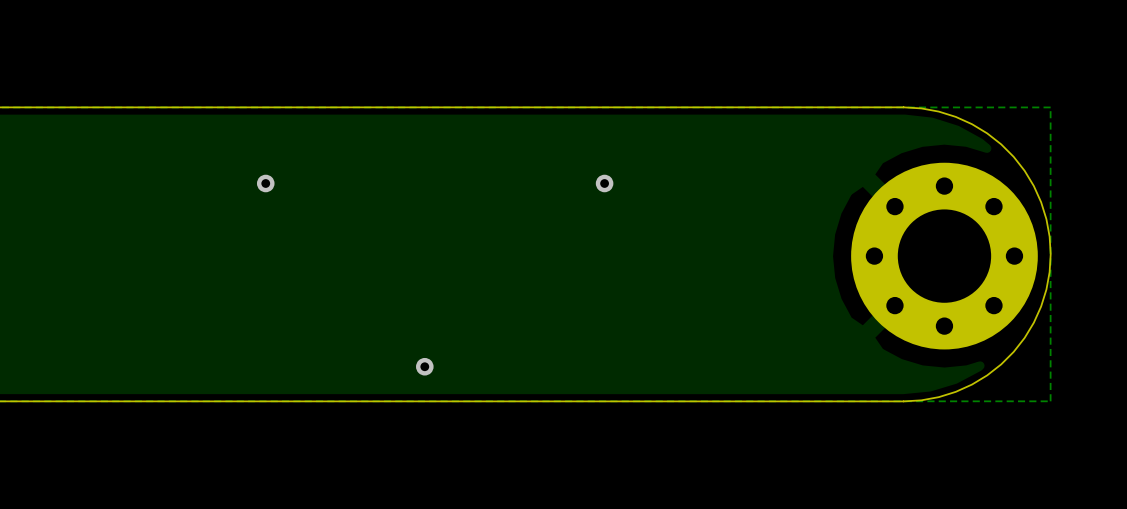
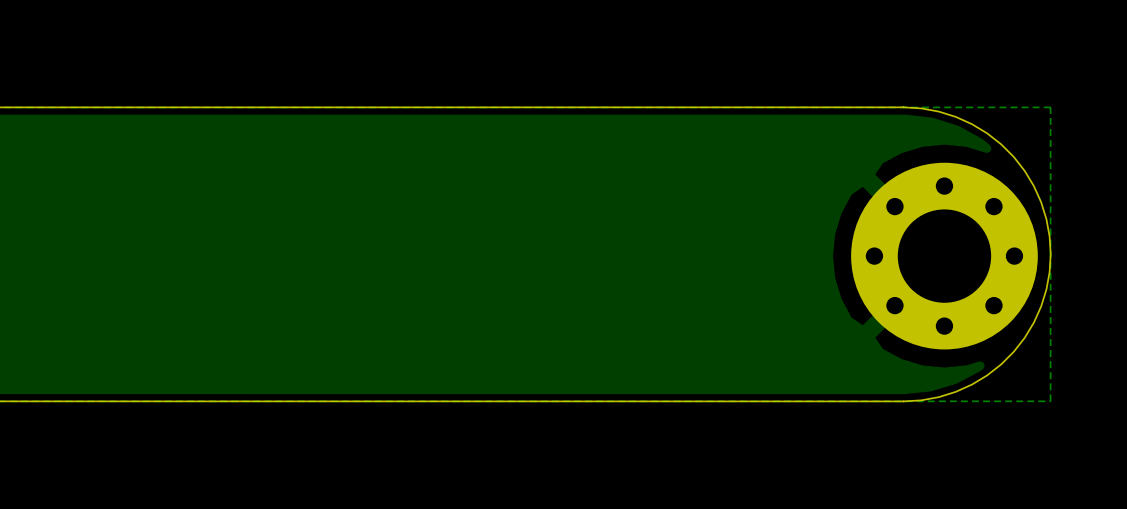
via: (265, 183) -> none
via: (604, 183) -> none
via: (424, 366) -> none

